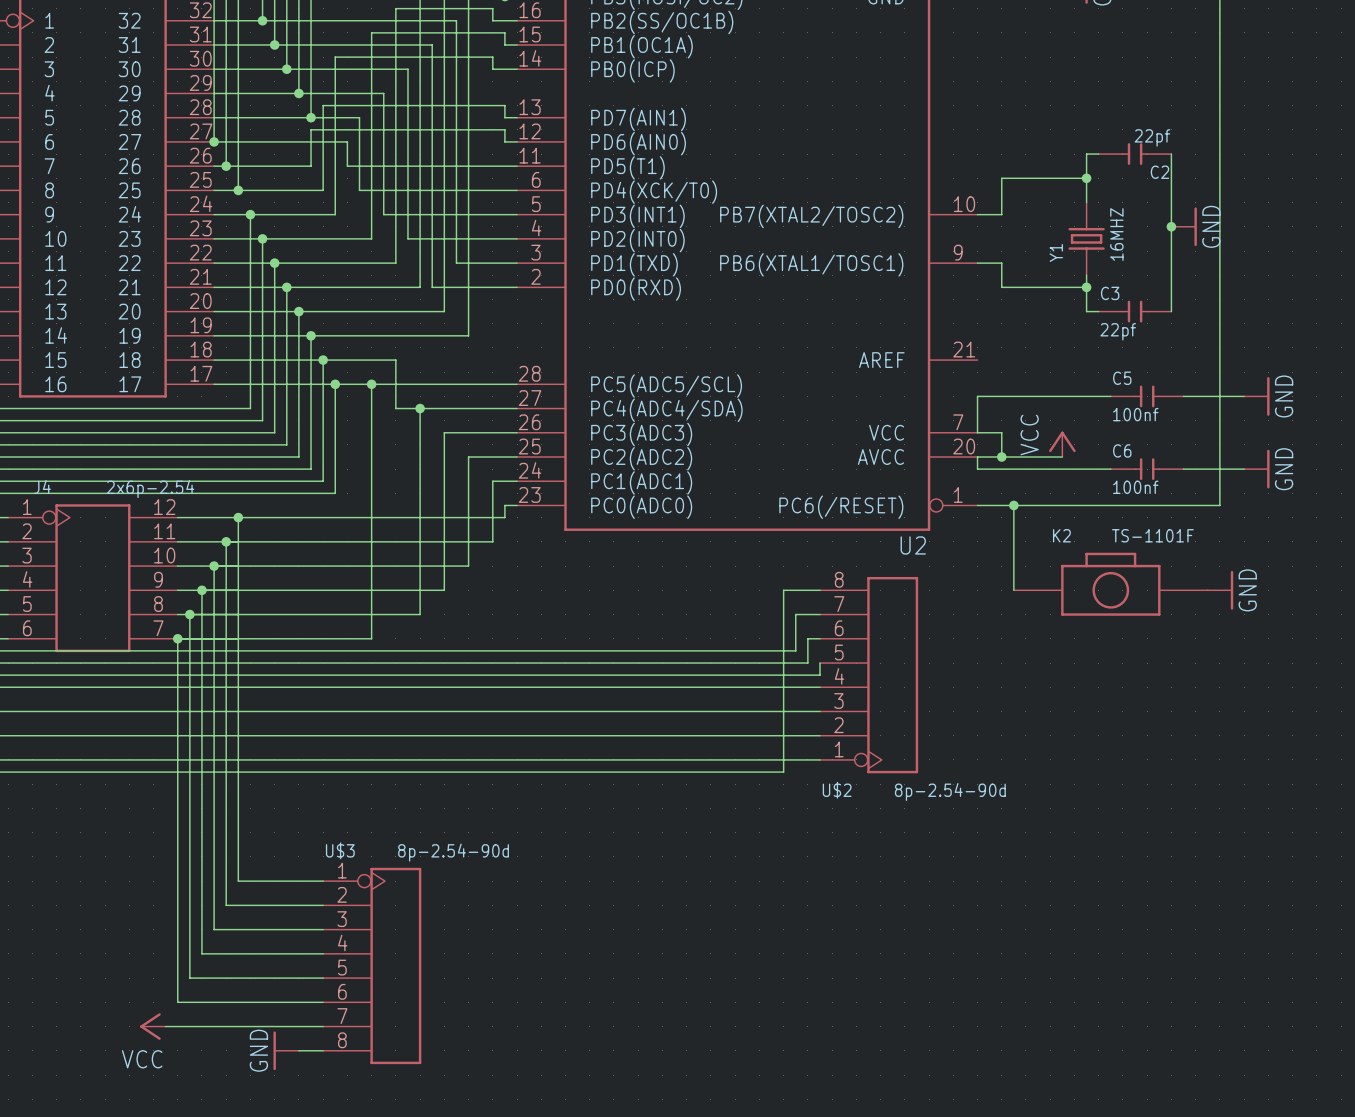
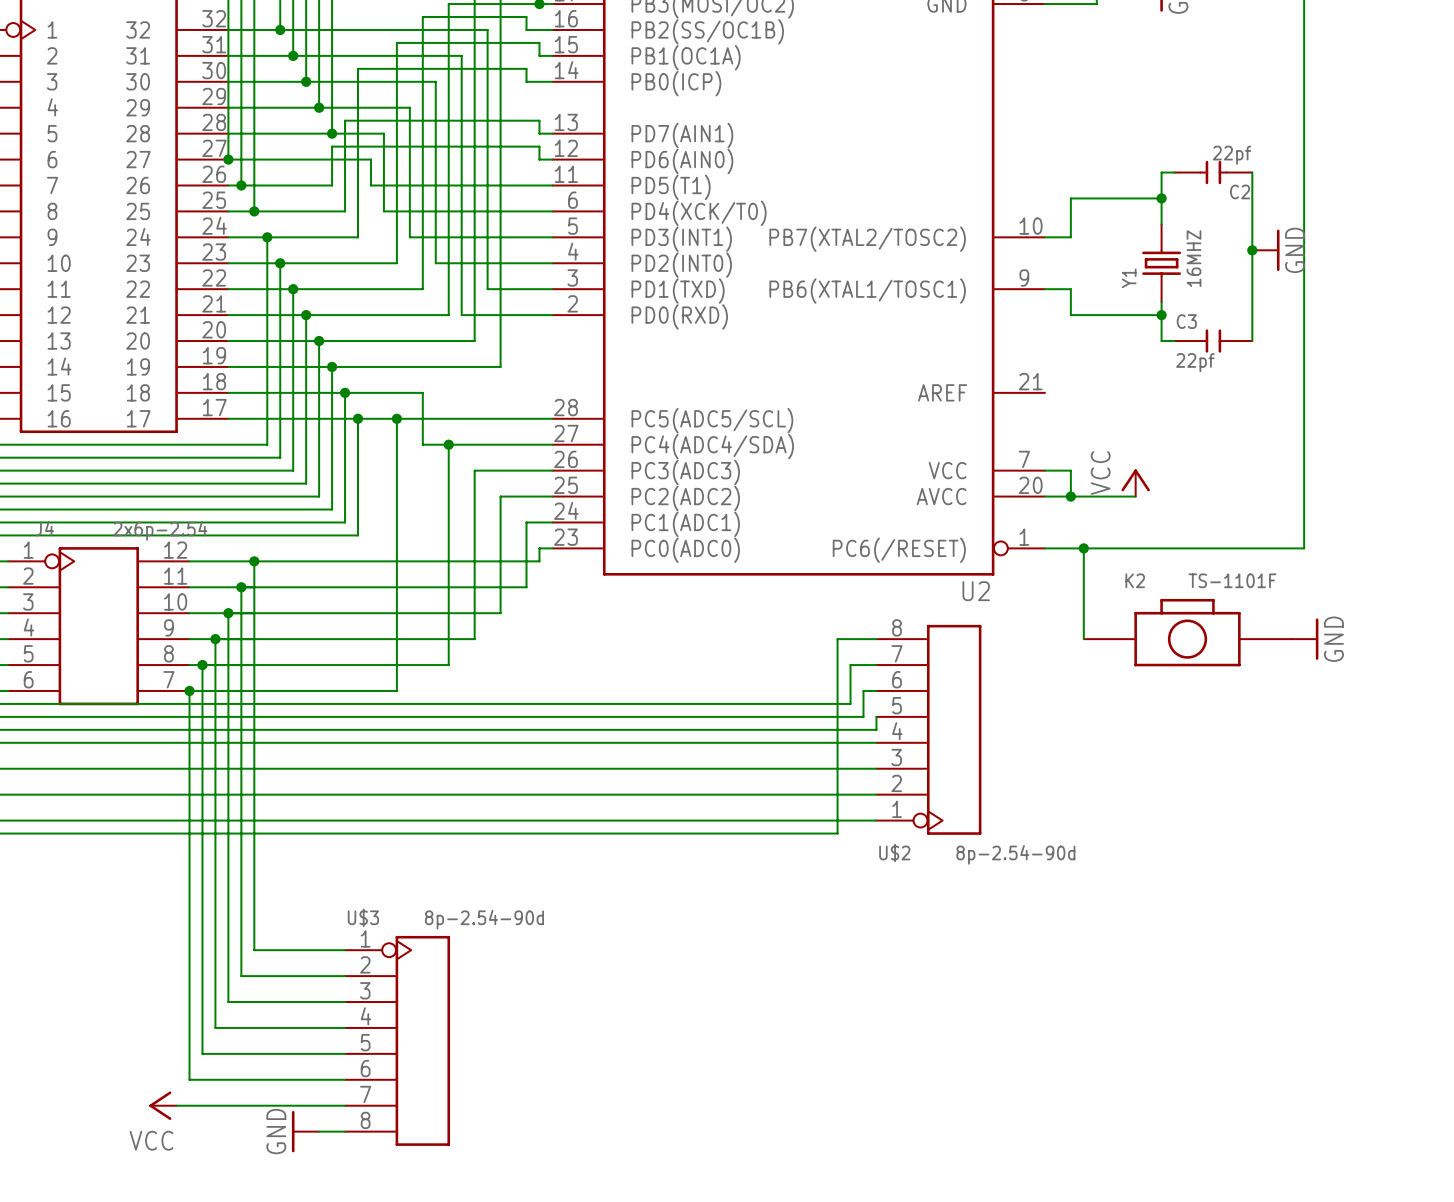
wire: (1110, 396) (977, 396) (977, 432) -> none
C5: 100nf (1147, 396) -> none
wire: (1183, 396) (1244, 396) -> none
power symbol: GND (1256, 396) -> none
wire: (977, 457) (977, 469) (1110, 469) -> none
C6: 100nf (1147, 469) -> none
wire: (1183, 469) (1244, 469) -> none
power symbol: GND (1256, 469) -> none

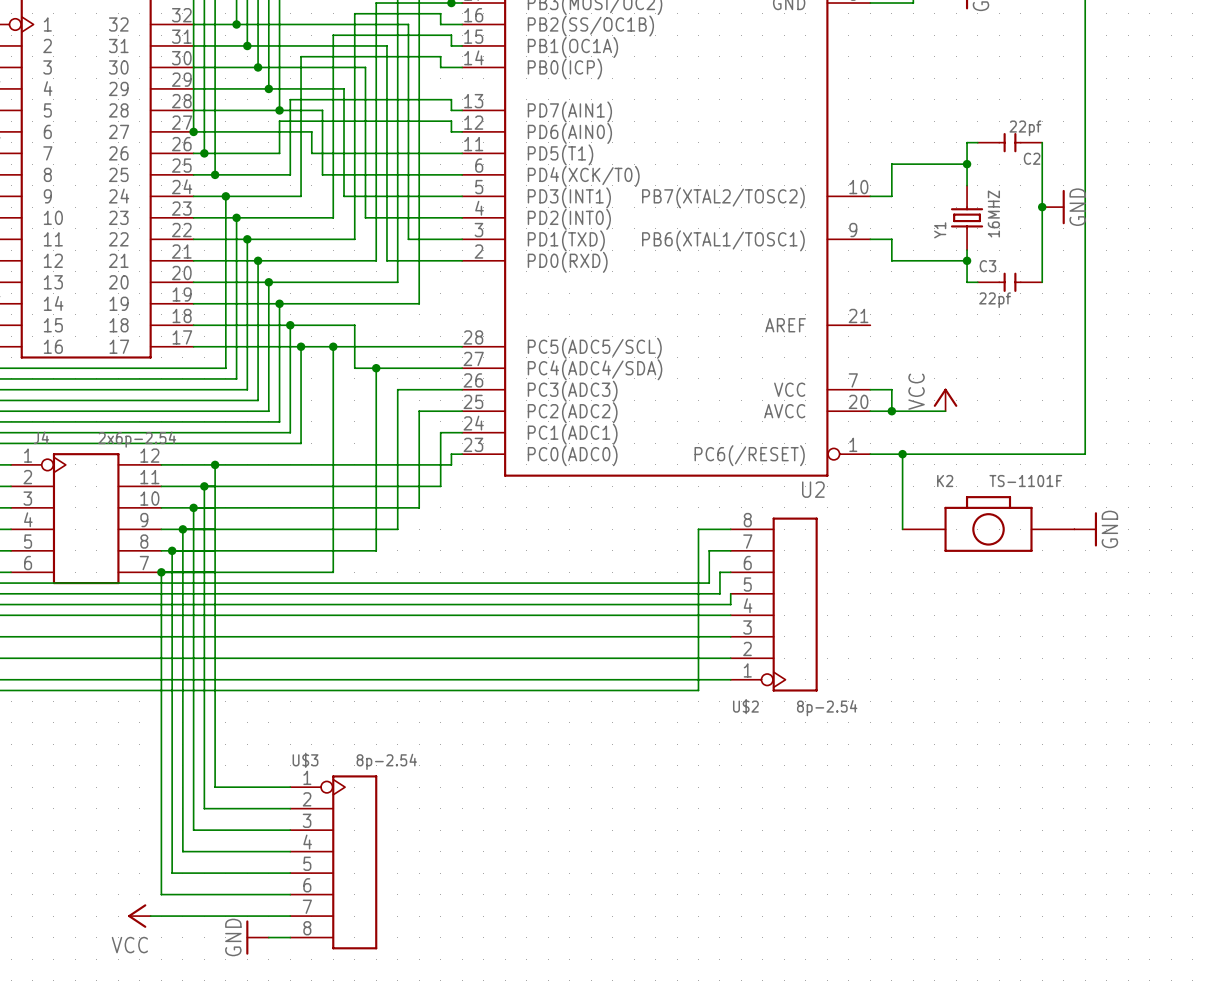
U$2 value: 8p-2.54-90d (1015, 854) -> 8p-2.54 (827, 708)
U$3 value: 8p-2.54-90d (484, 919) -> 8p-2.54 (386, 761)

